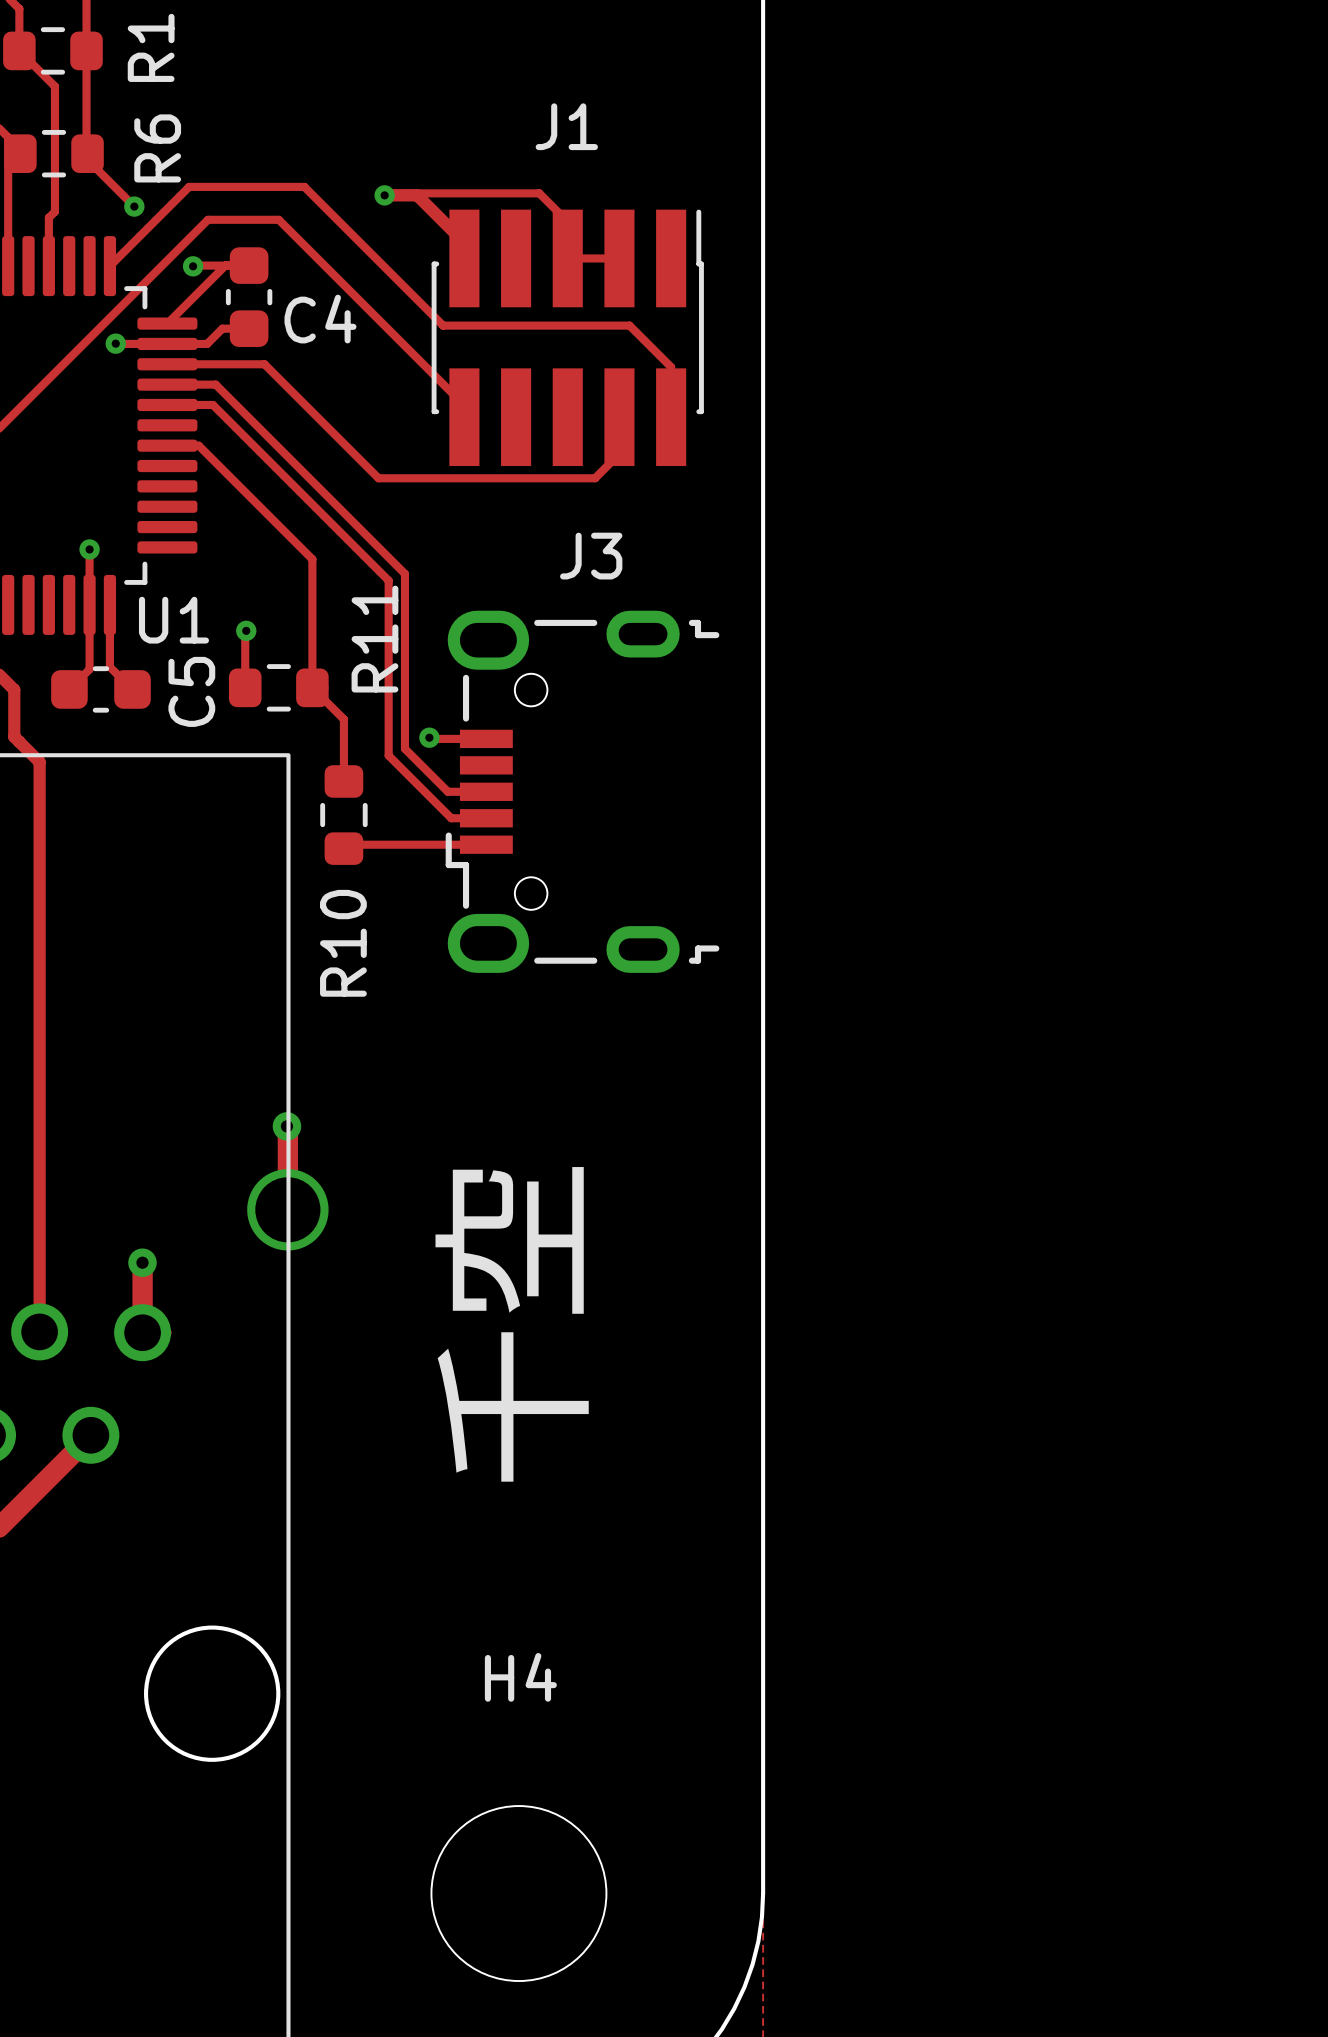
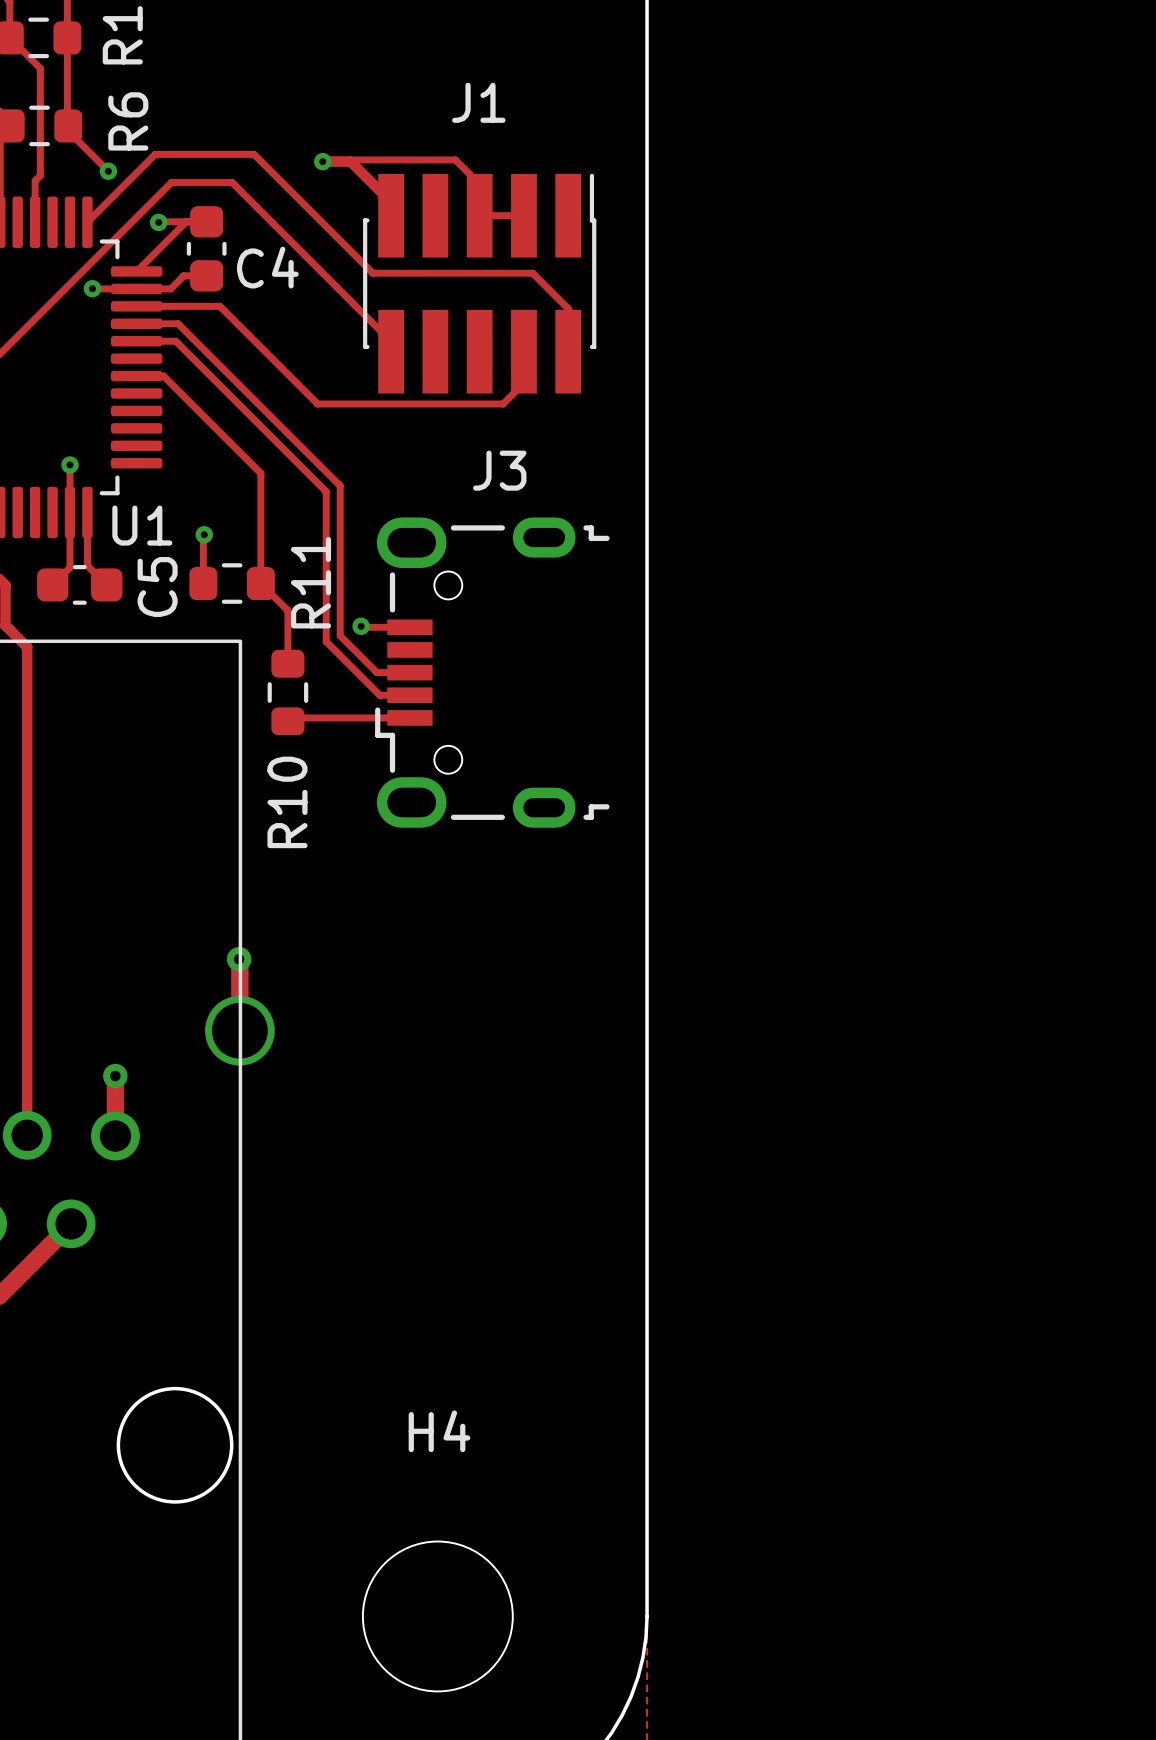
R11 name position: R11 (374, 639) -> R11 (311, 582)
text: 千空 (512, 1324) -> none

